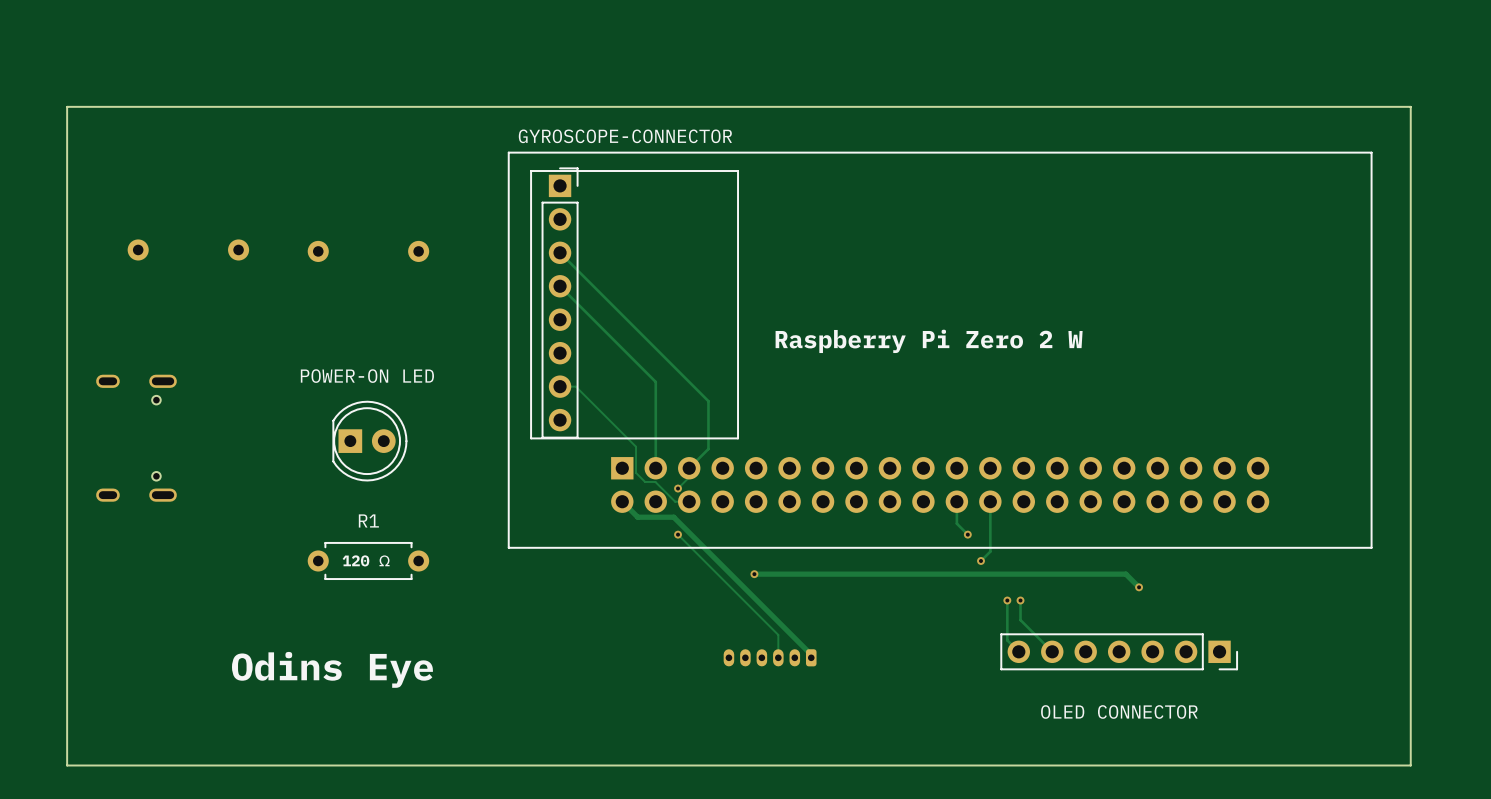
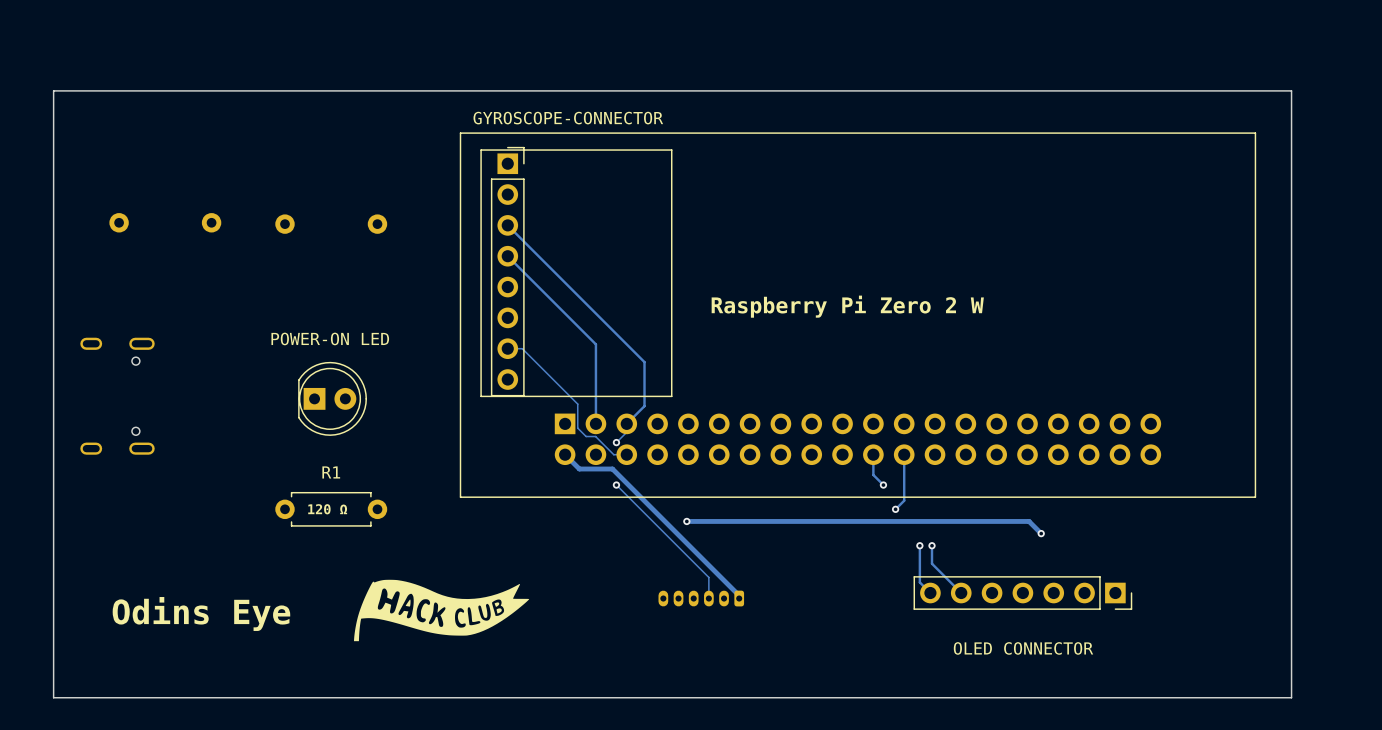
drawing: none -> [353, 579, 530, 642]
text position: Odins Eye (332, 669) -> Odins Eye (201, 613)

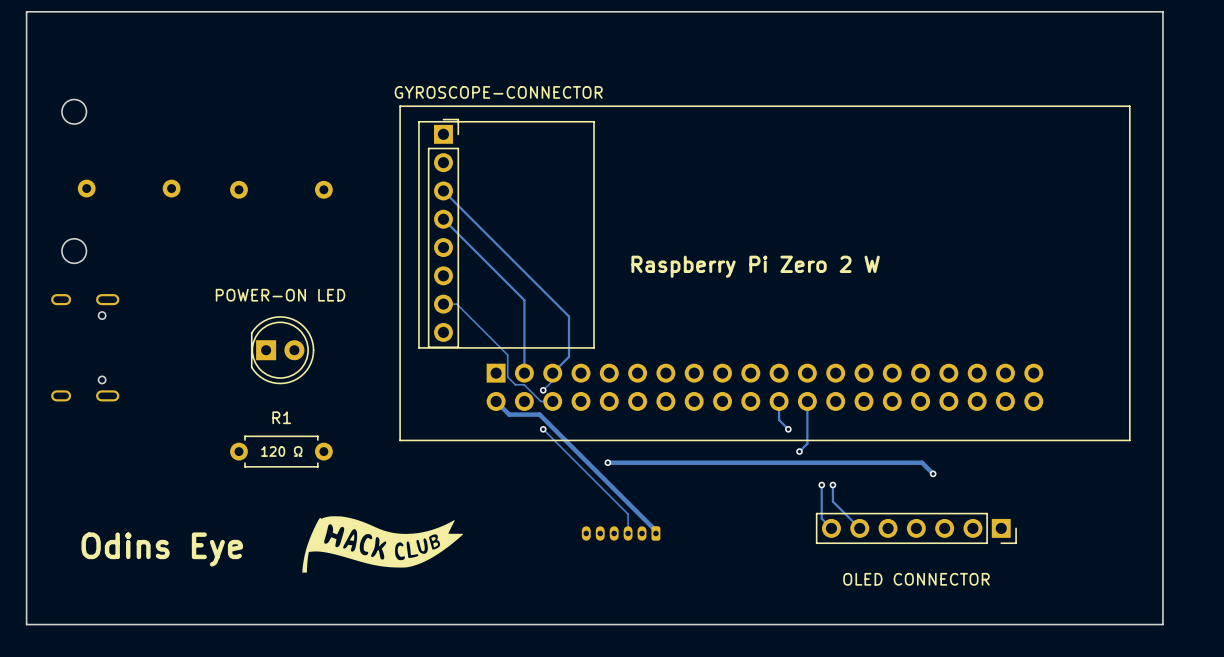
board edge: (1291, 90) (53, 90) -> (1162, 67) (1162, 11) (26, 11) (26, 67)
round board edge: none -> [61, 99, 87, 125]
round board edge: none -> [61, 238, 87, 264]

